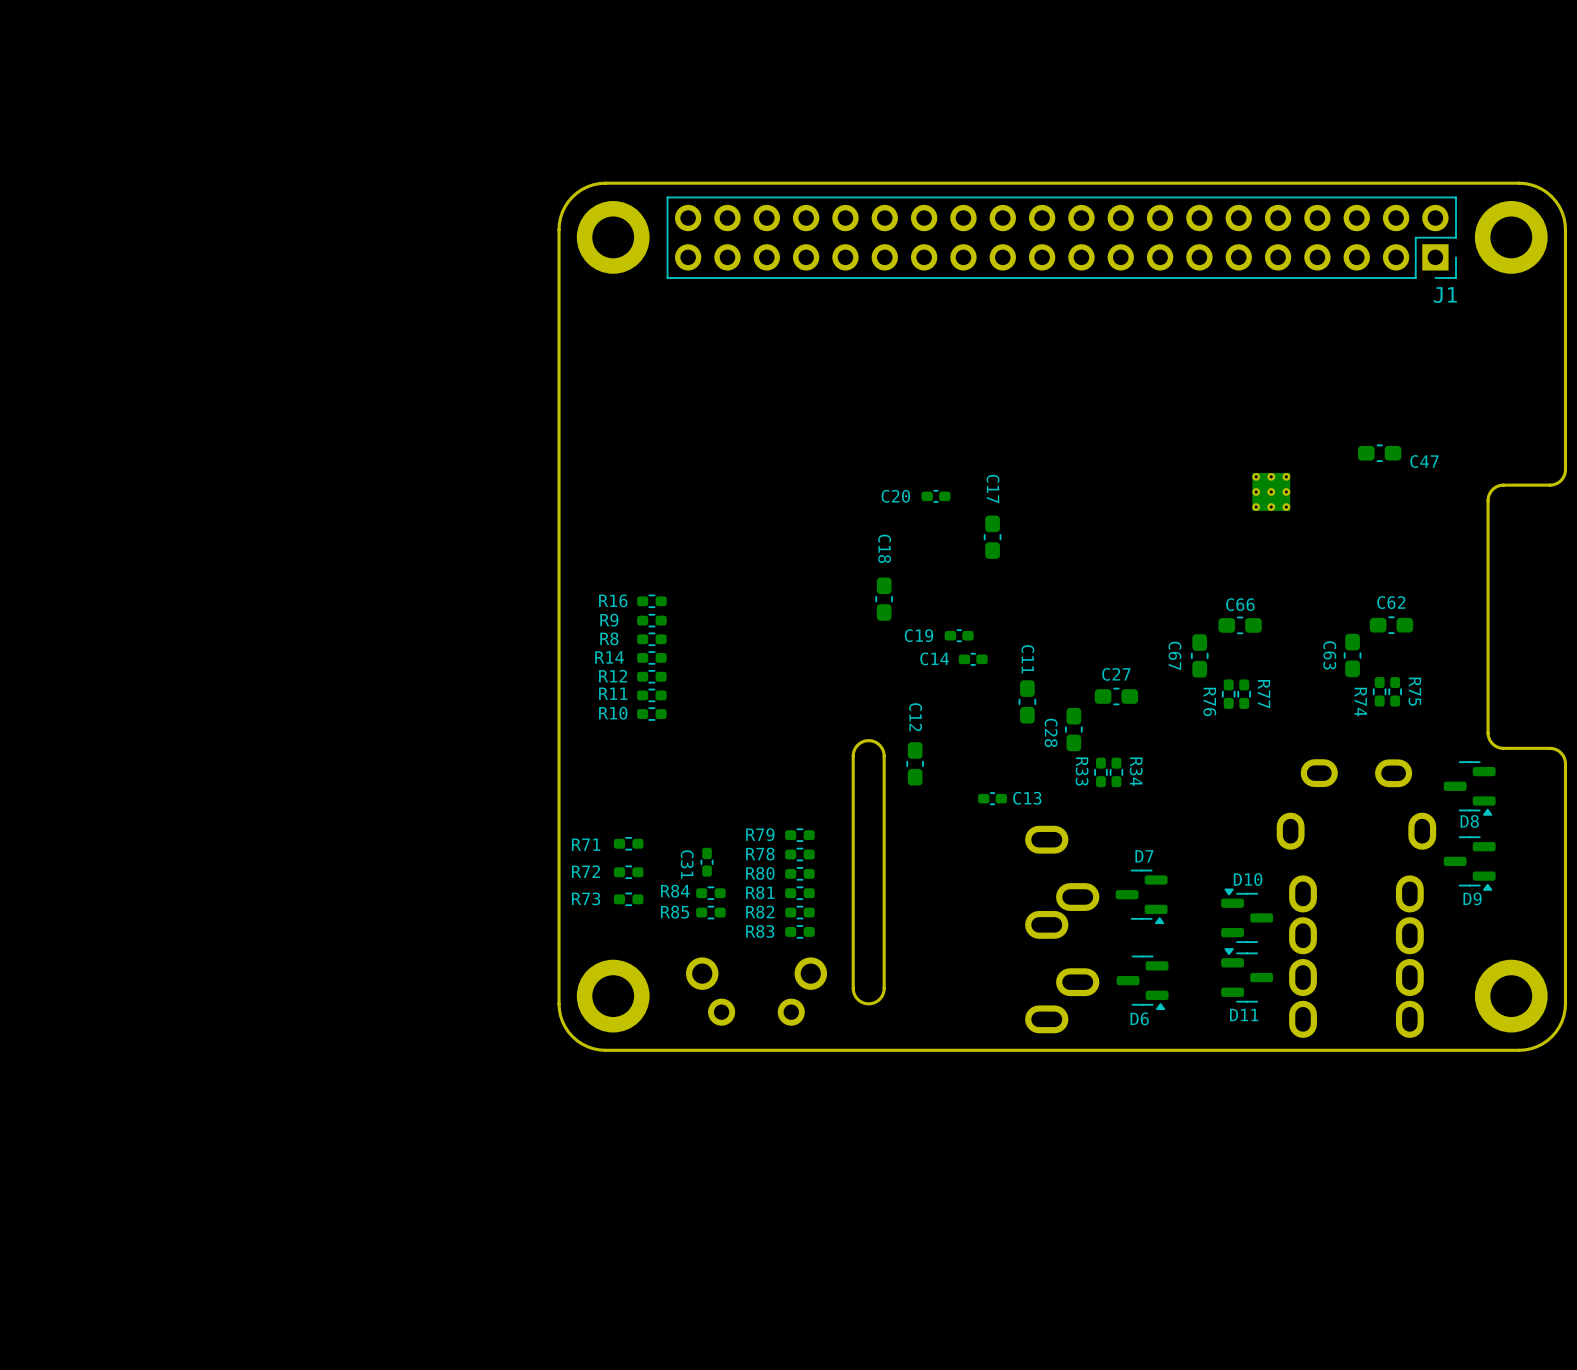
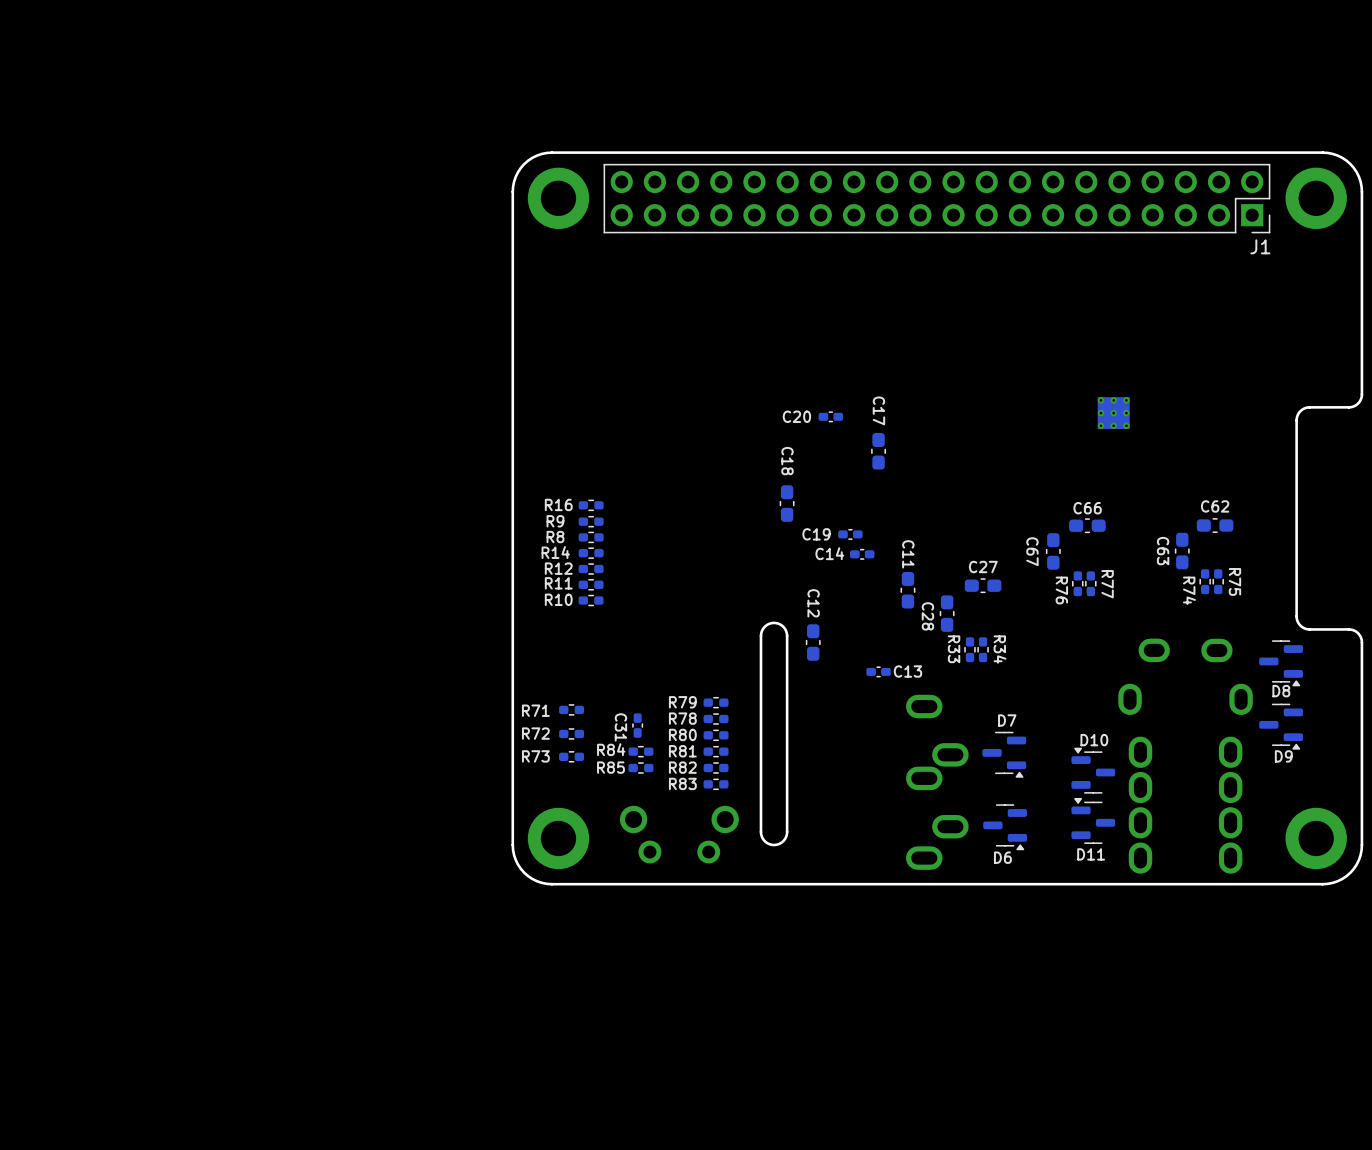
C47: (1379, 453) -> none

